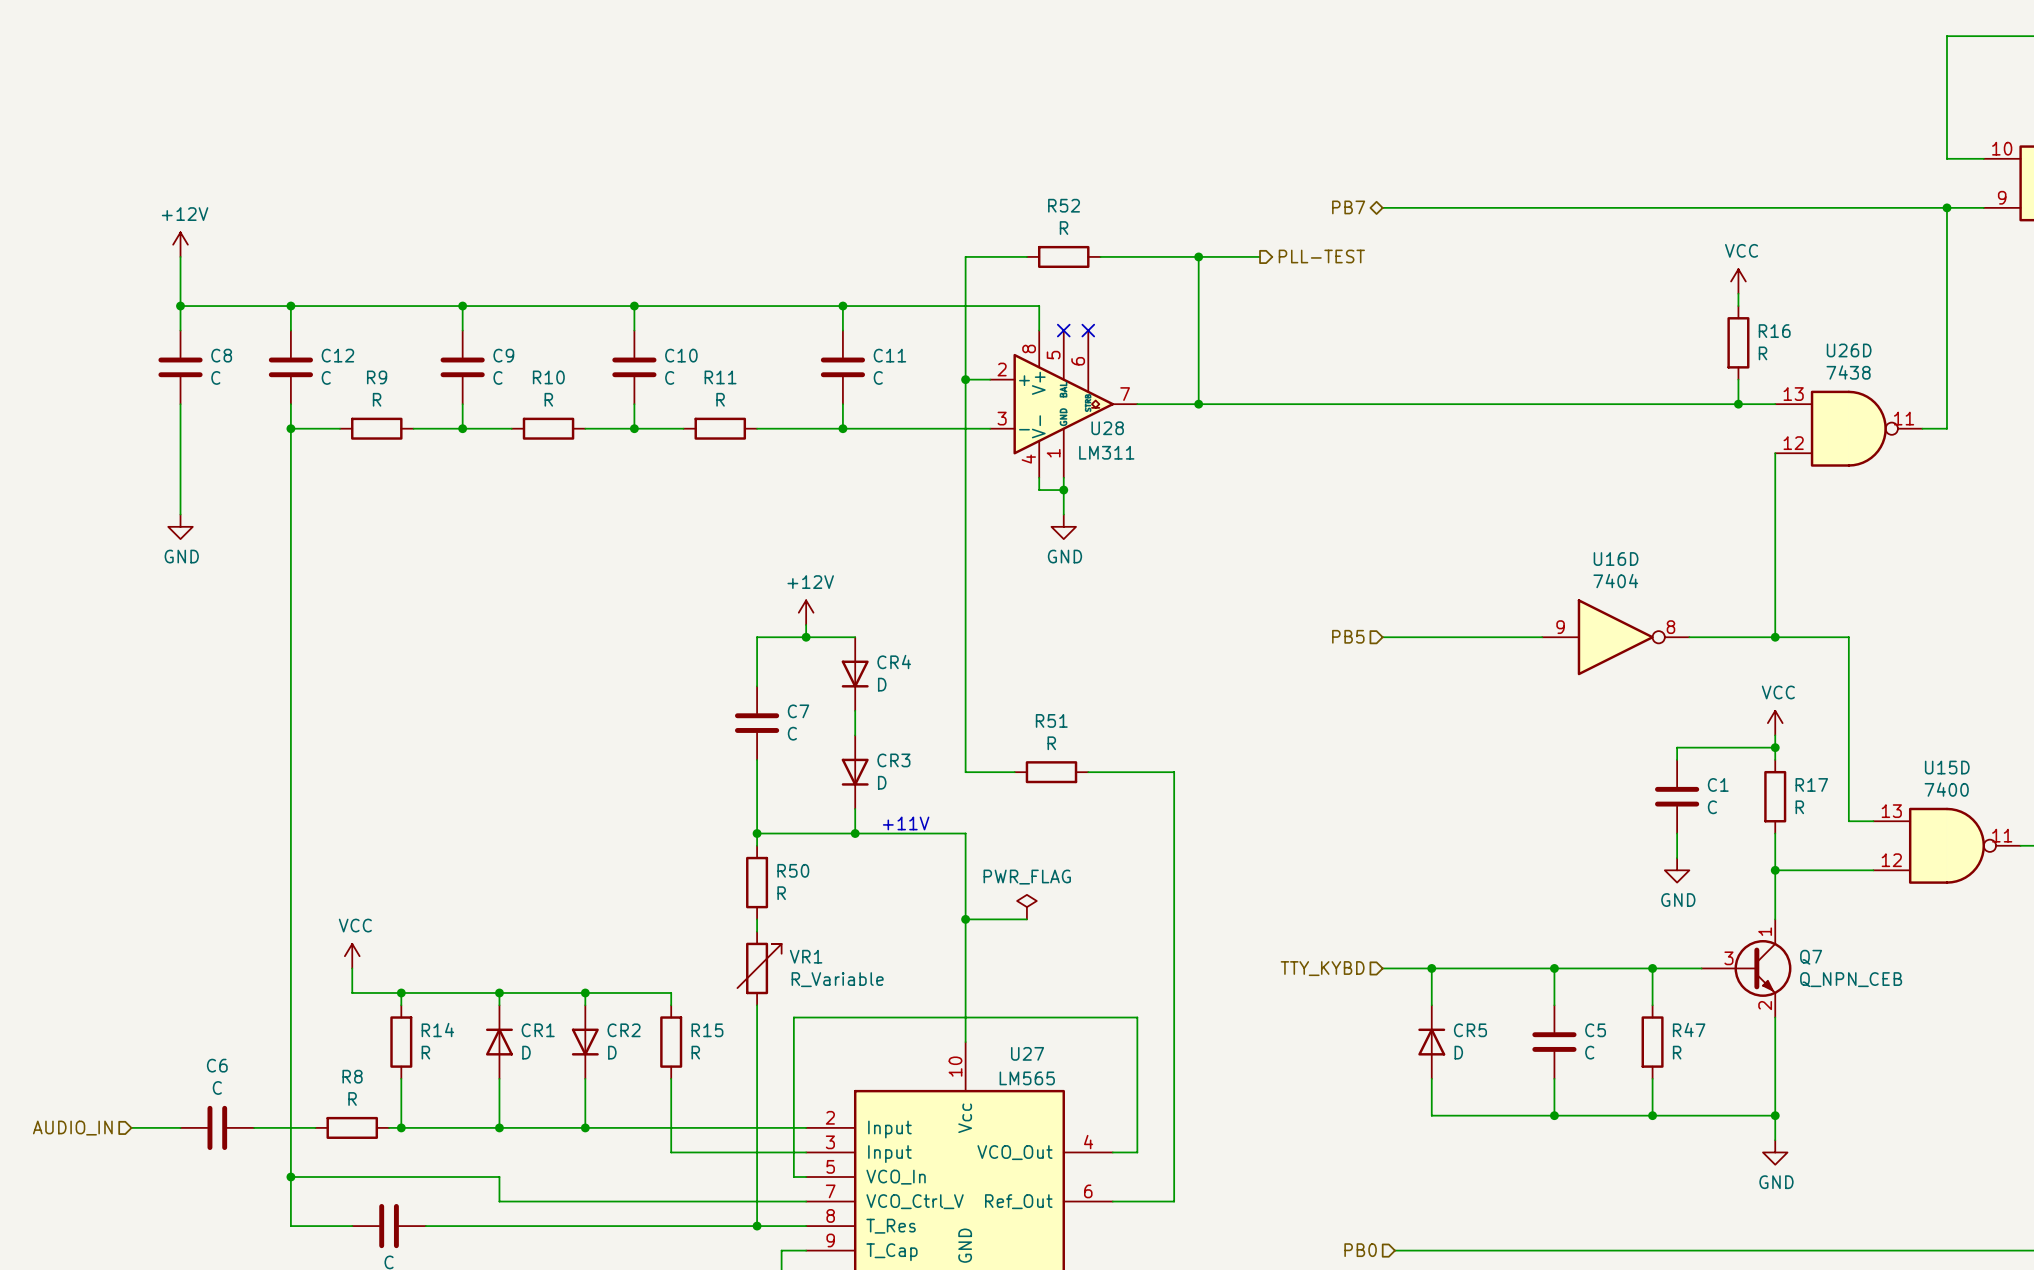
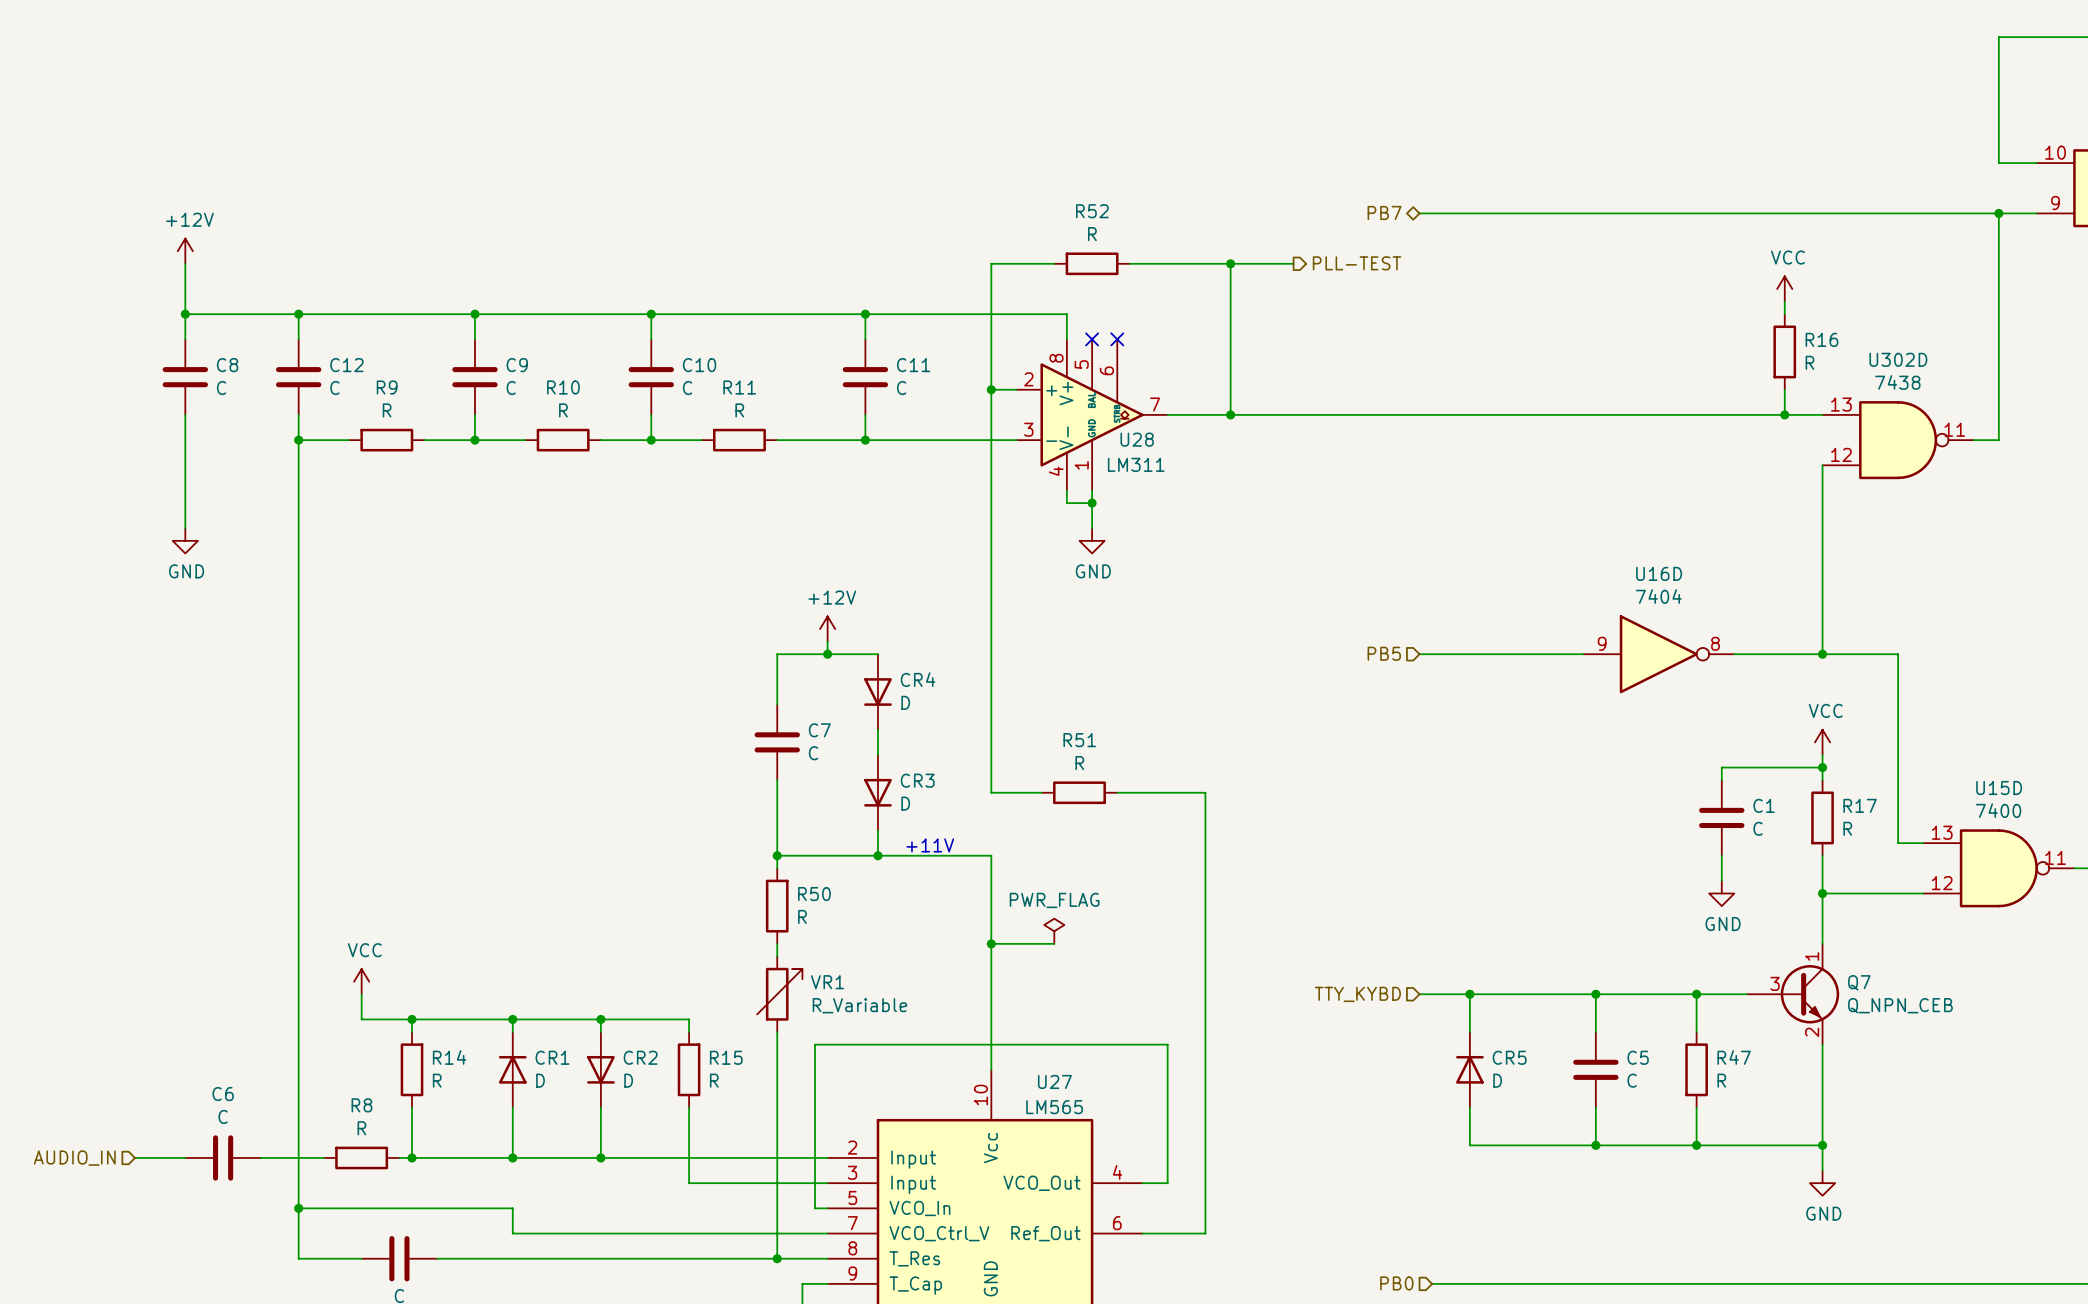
U26D name: U26D (1849, 350) -> U302D (1898, 359)

